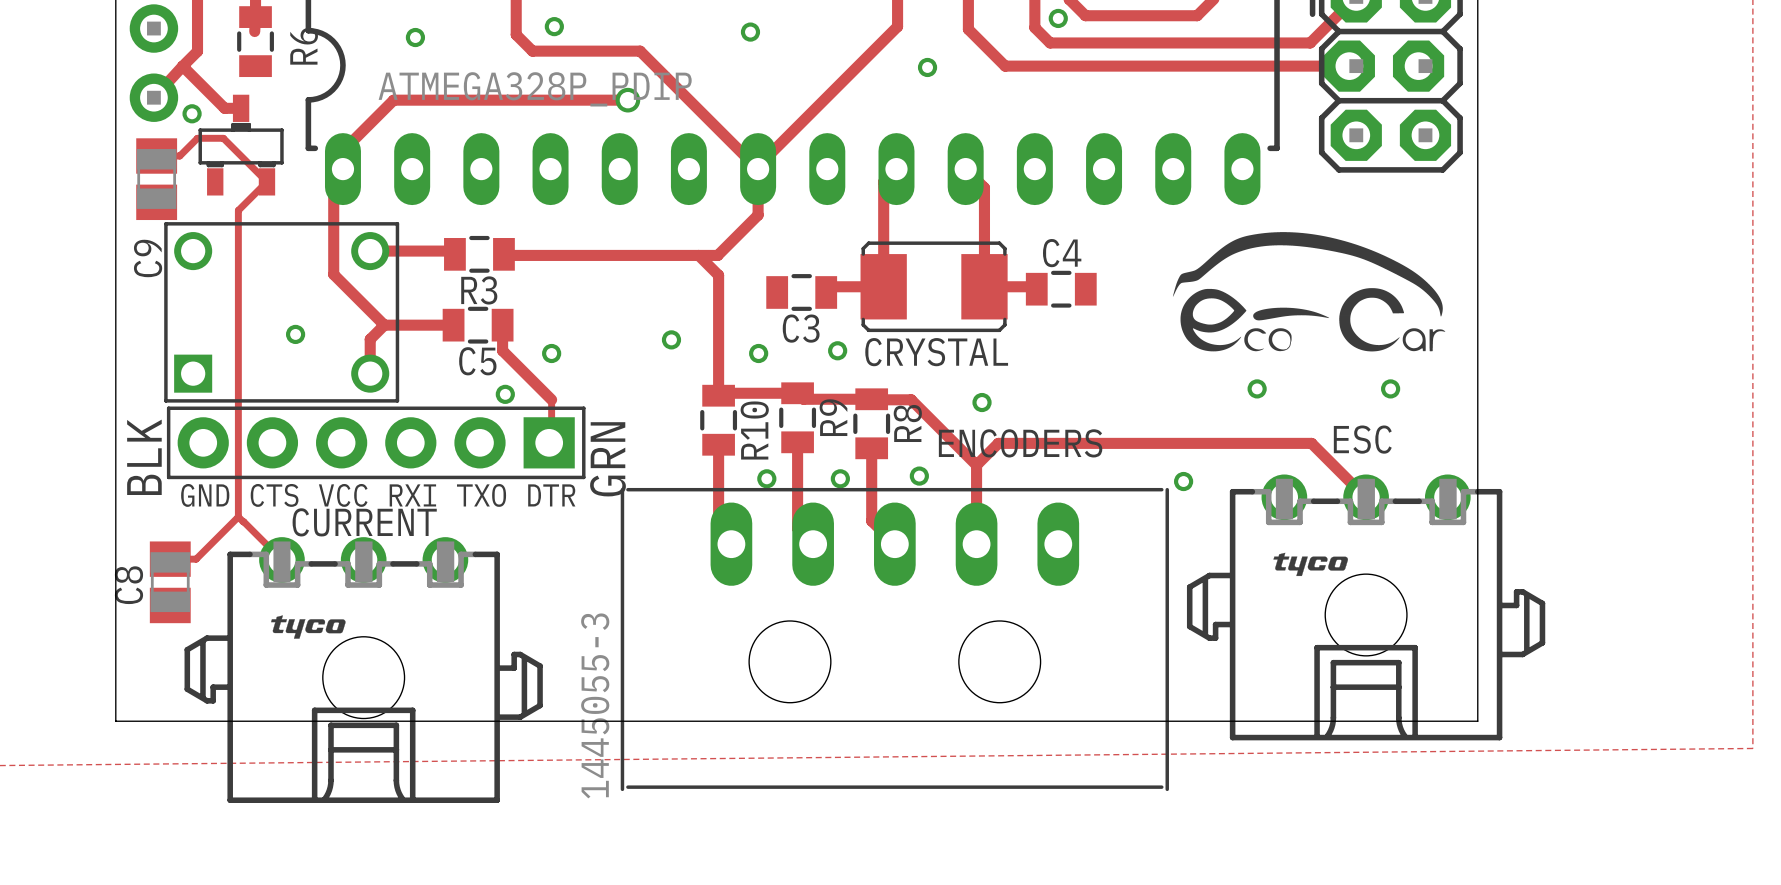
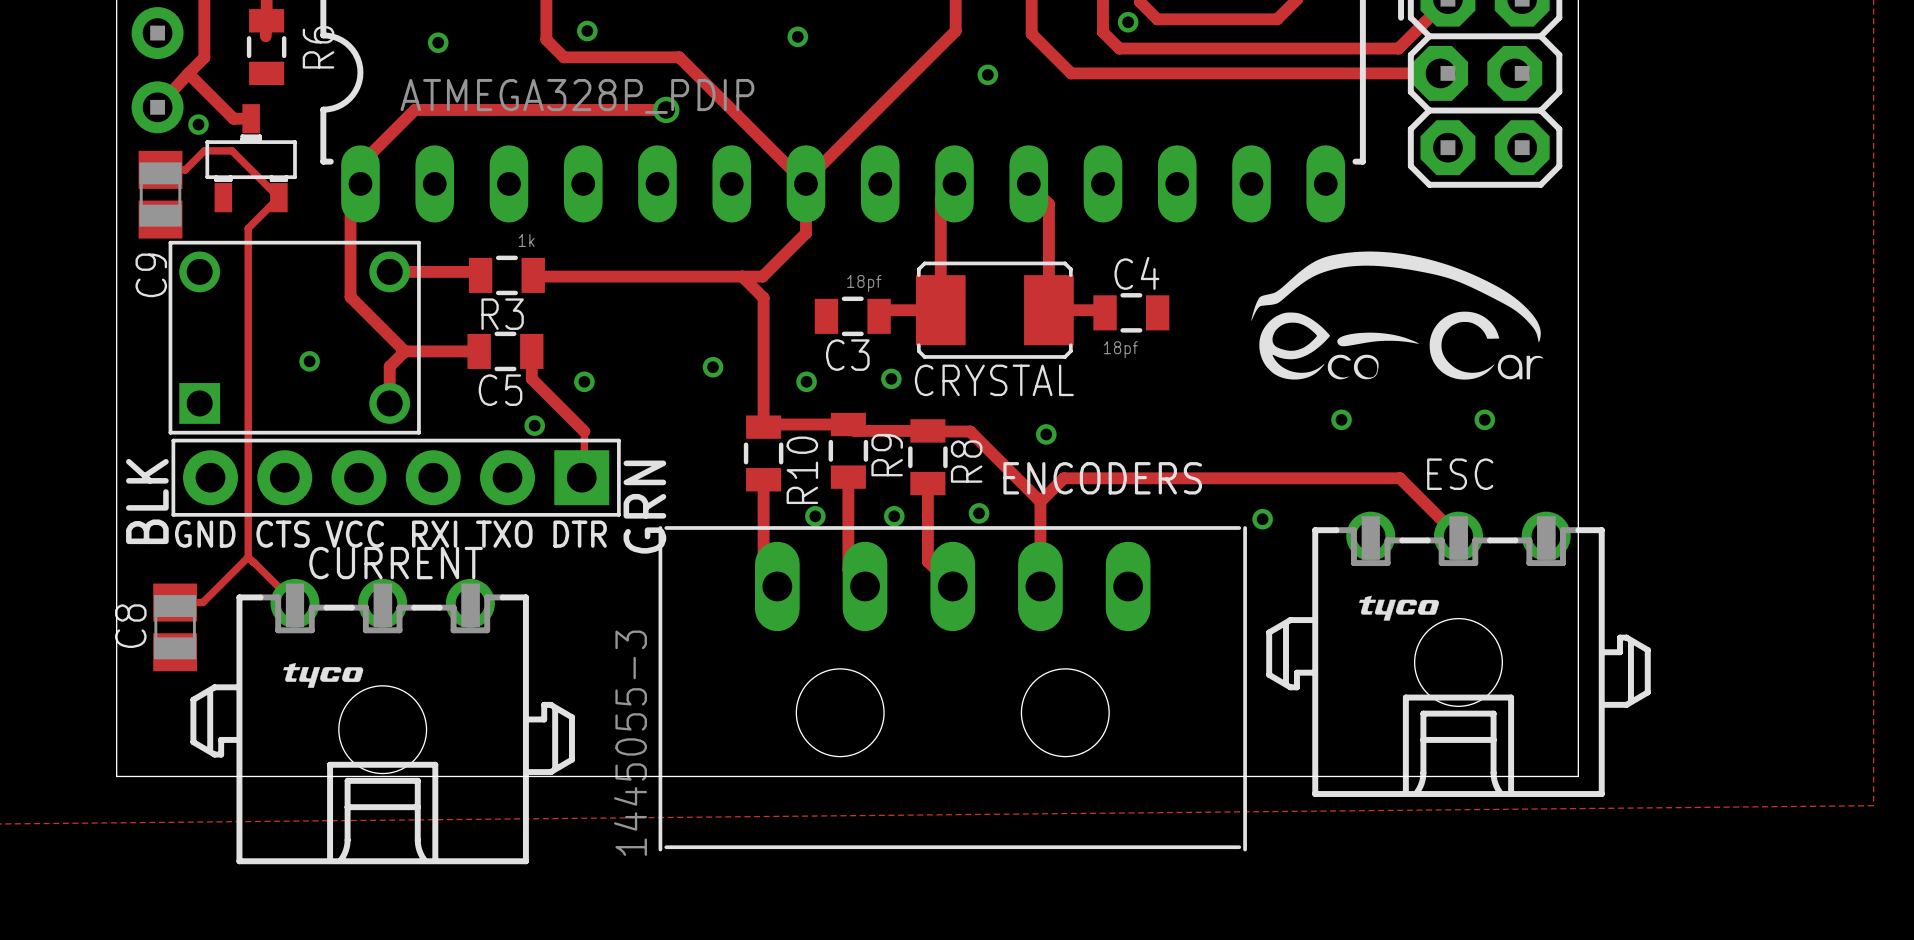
R3 value: none -> 1k (526, 240)
C3 value: none -> 18pf (864, 283)
C4 value: none -> 18pf (1120, 349)

